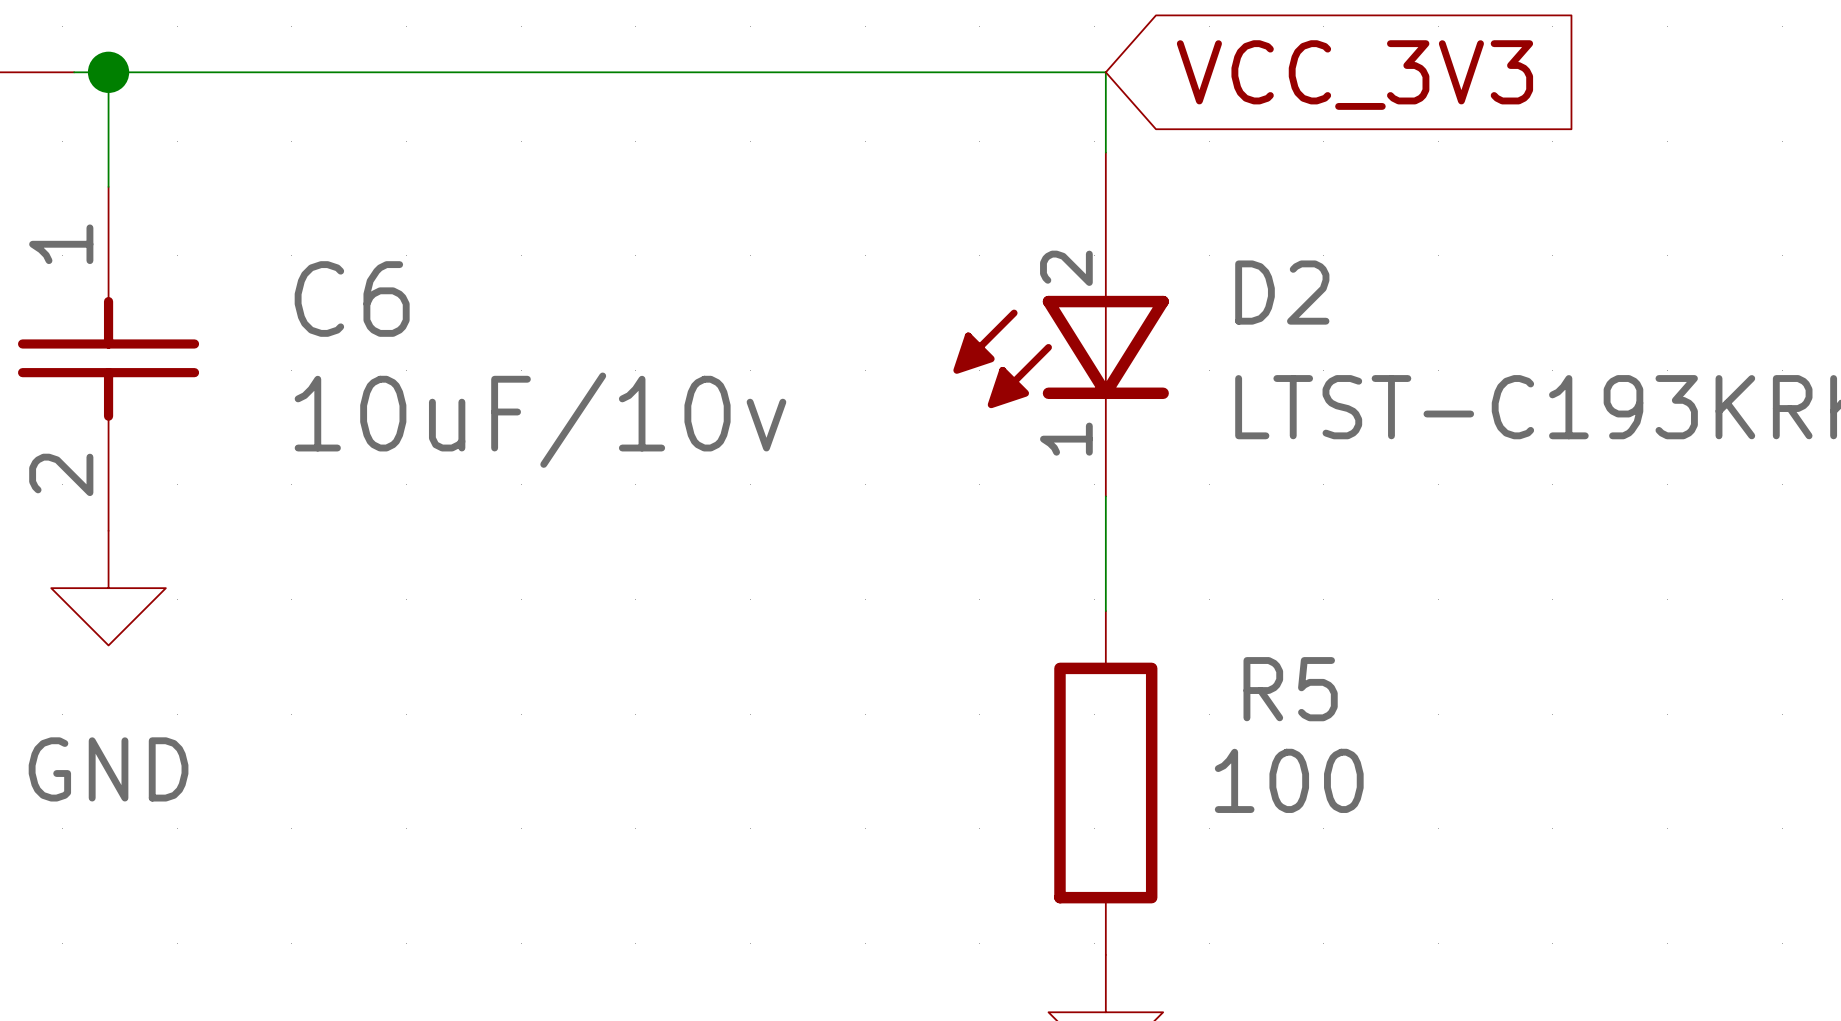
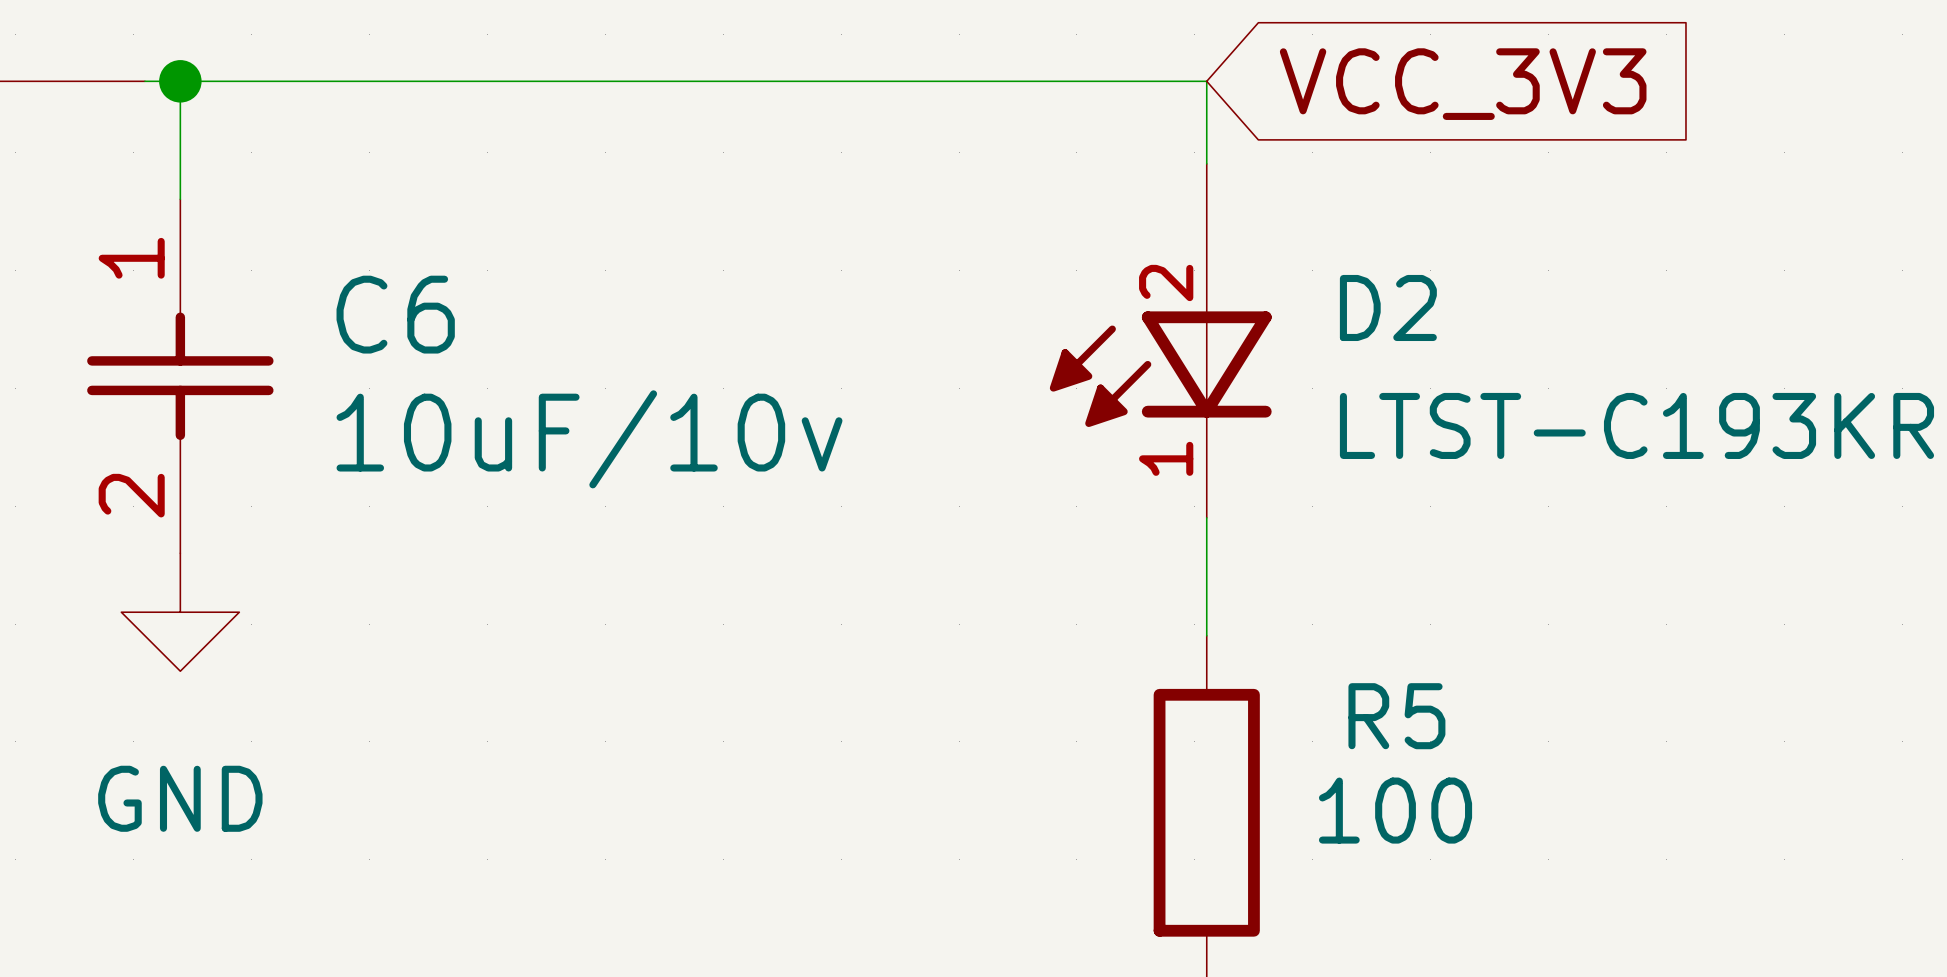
C6 name position: C6 (352, 298) -> C6 (395, 314)
C6 value position: 10uF/10v (540, 420) -> 10uF/10v (589, 439)

